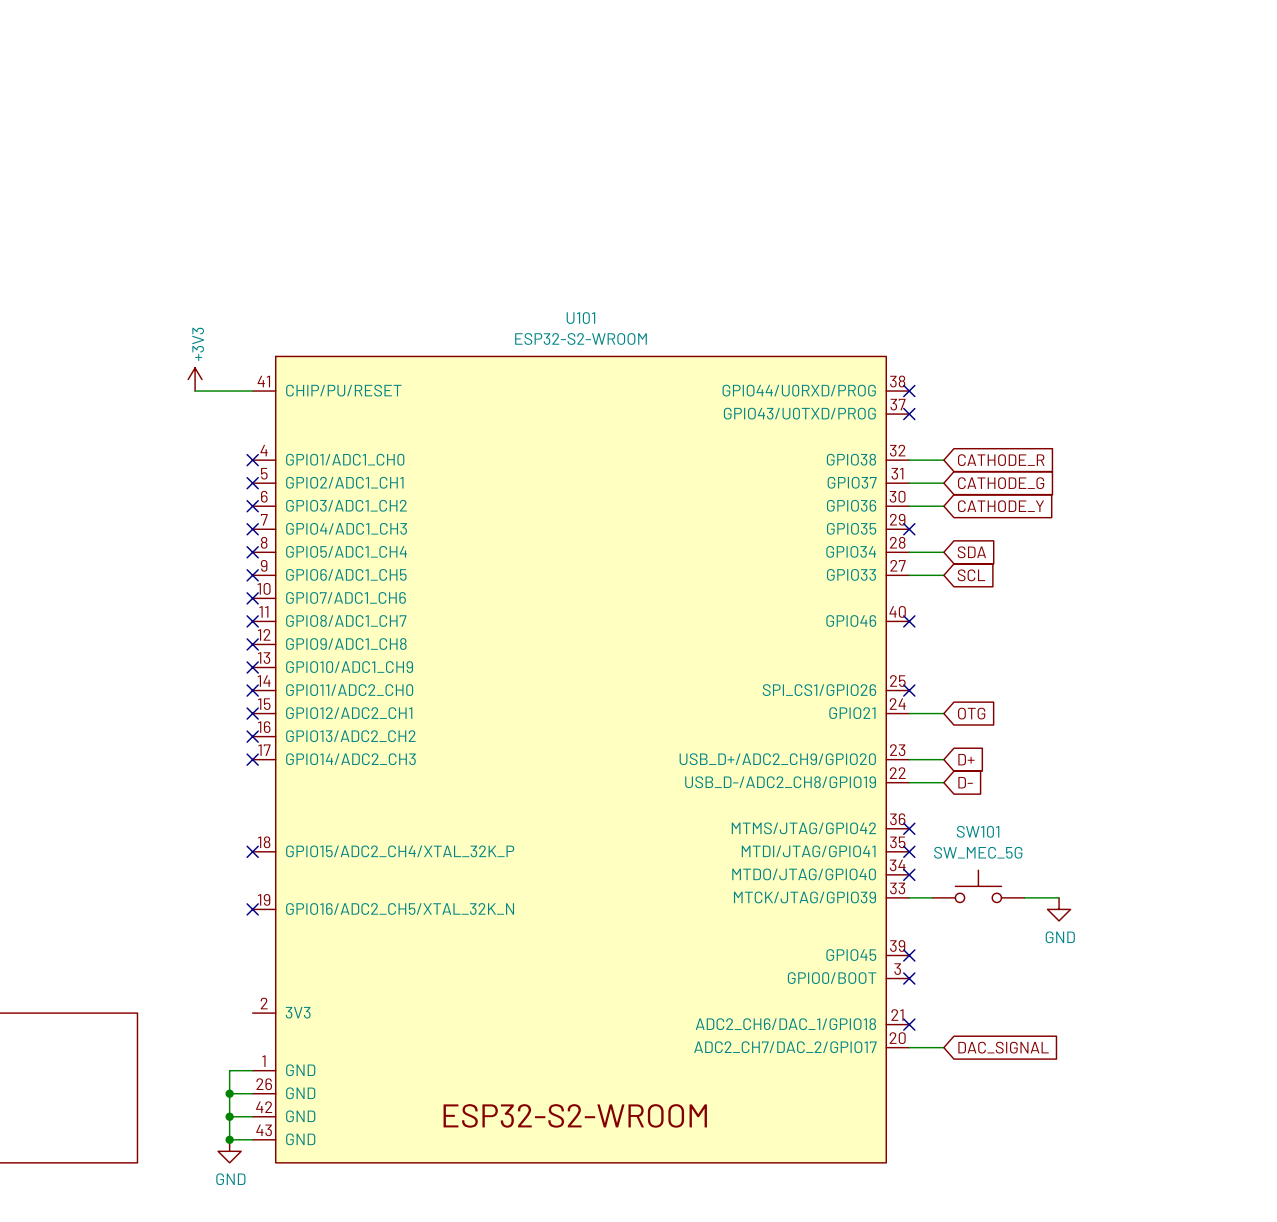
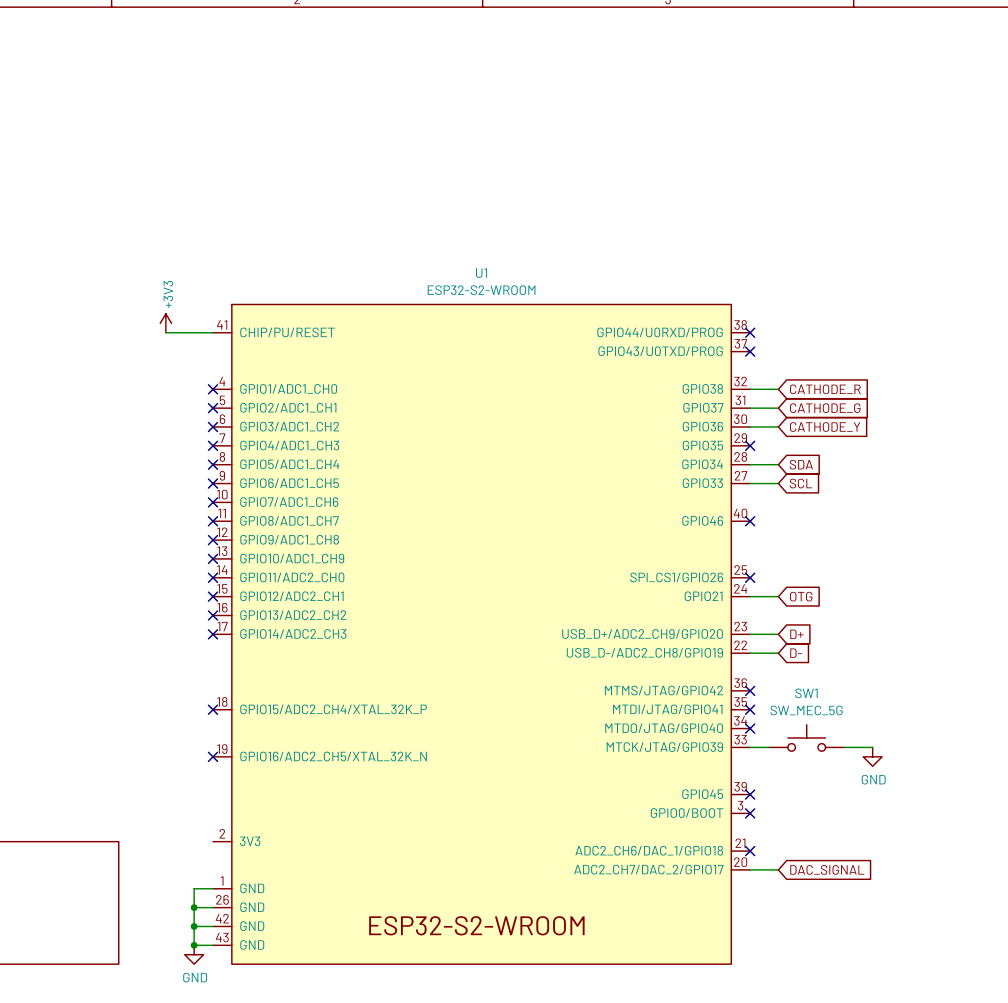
U101 name: U101 (580, 318) -> U1 (481, 273)
SW101 name: SW101 (978, 831) -> SW1 (806, 693)

